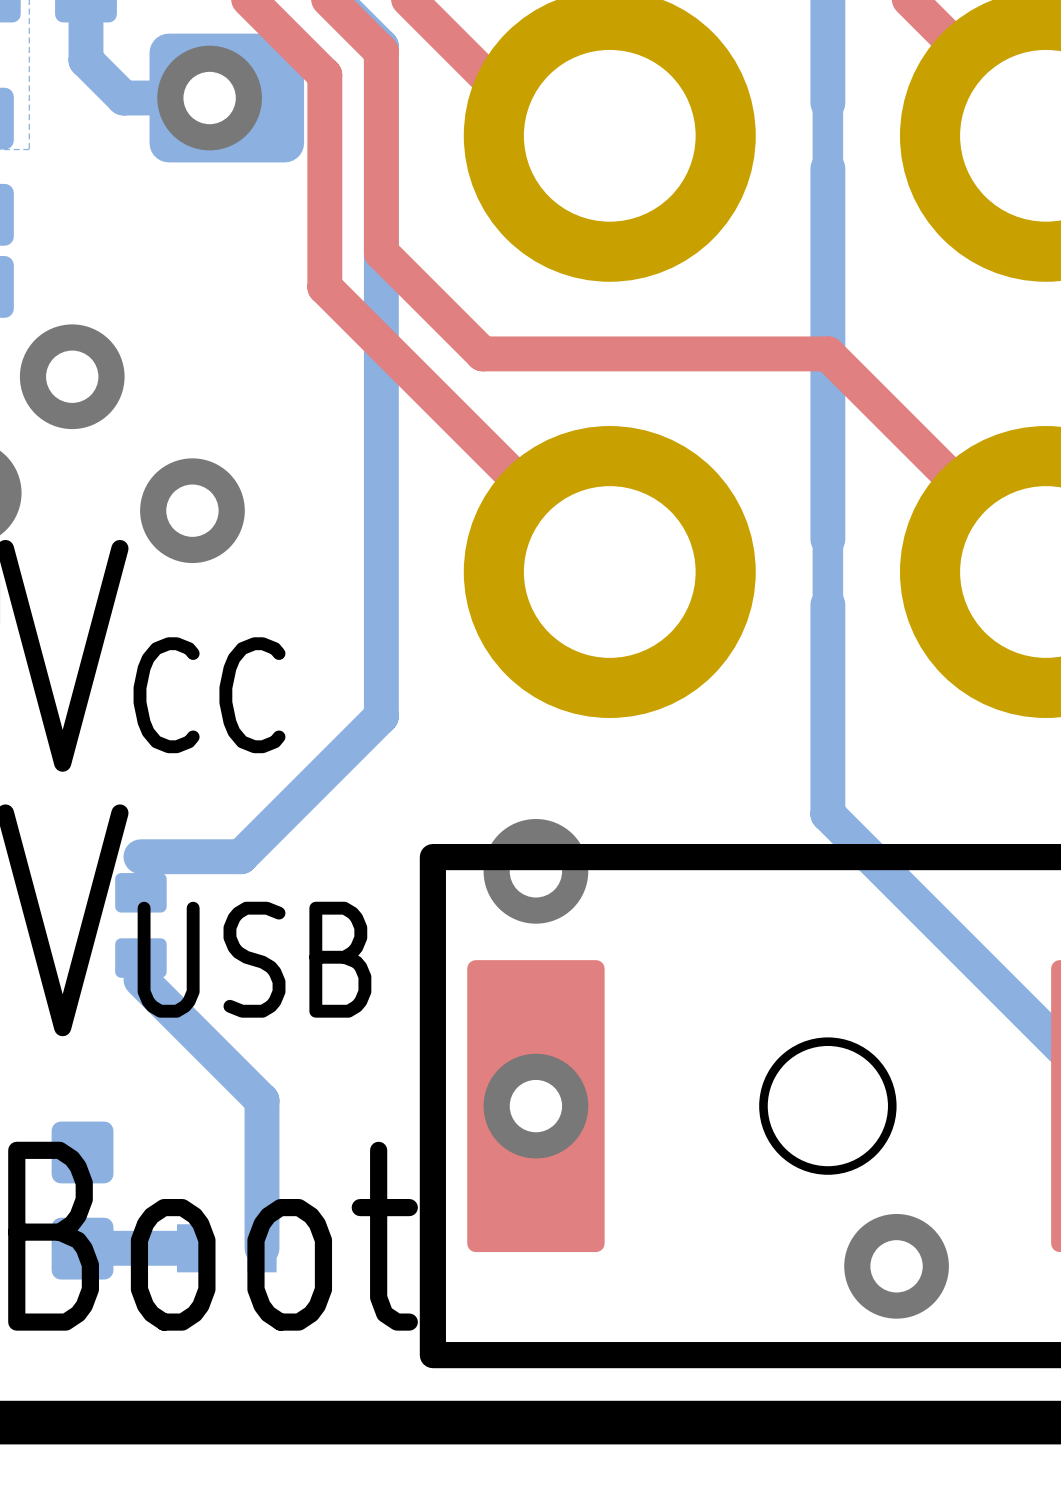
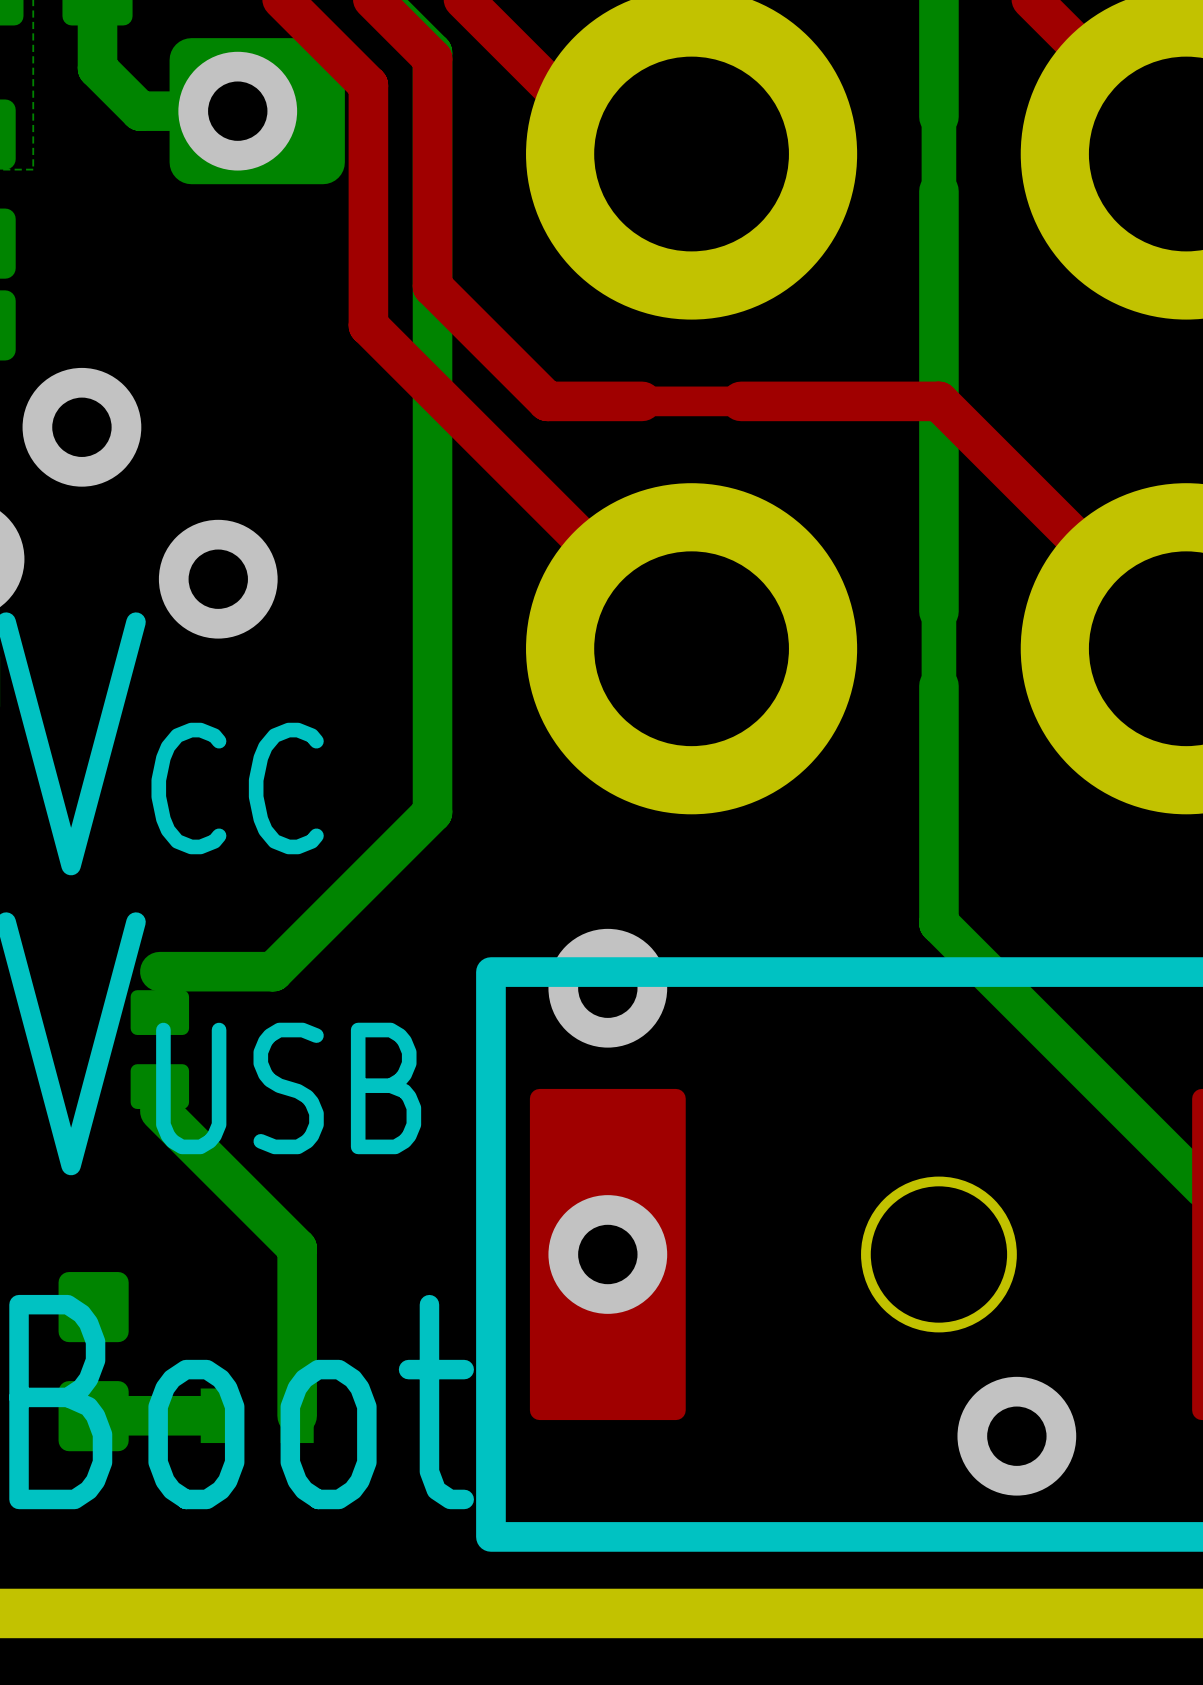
top track width: thick (566, 353) (653, 353) -> thin (642, 401) (741, 401)

